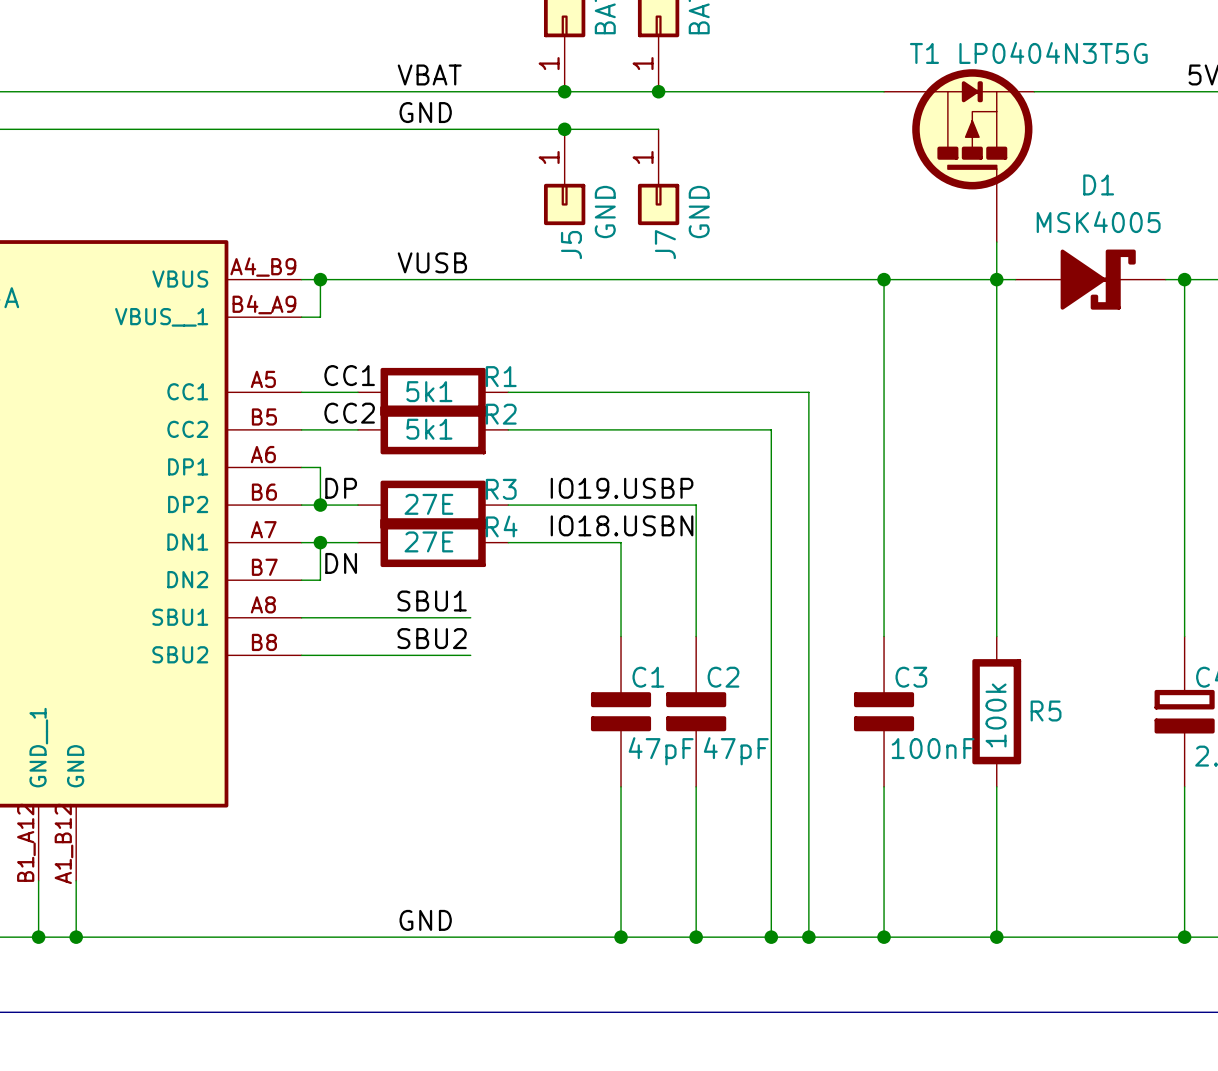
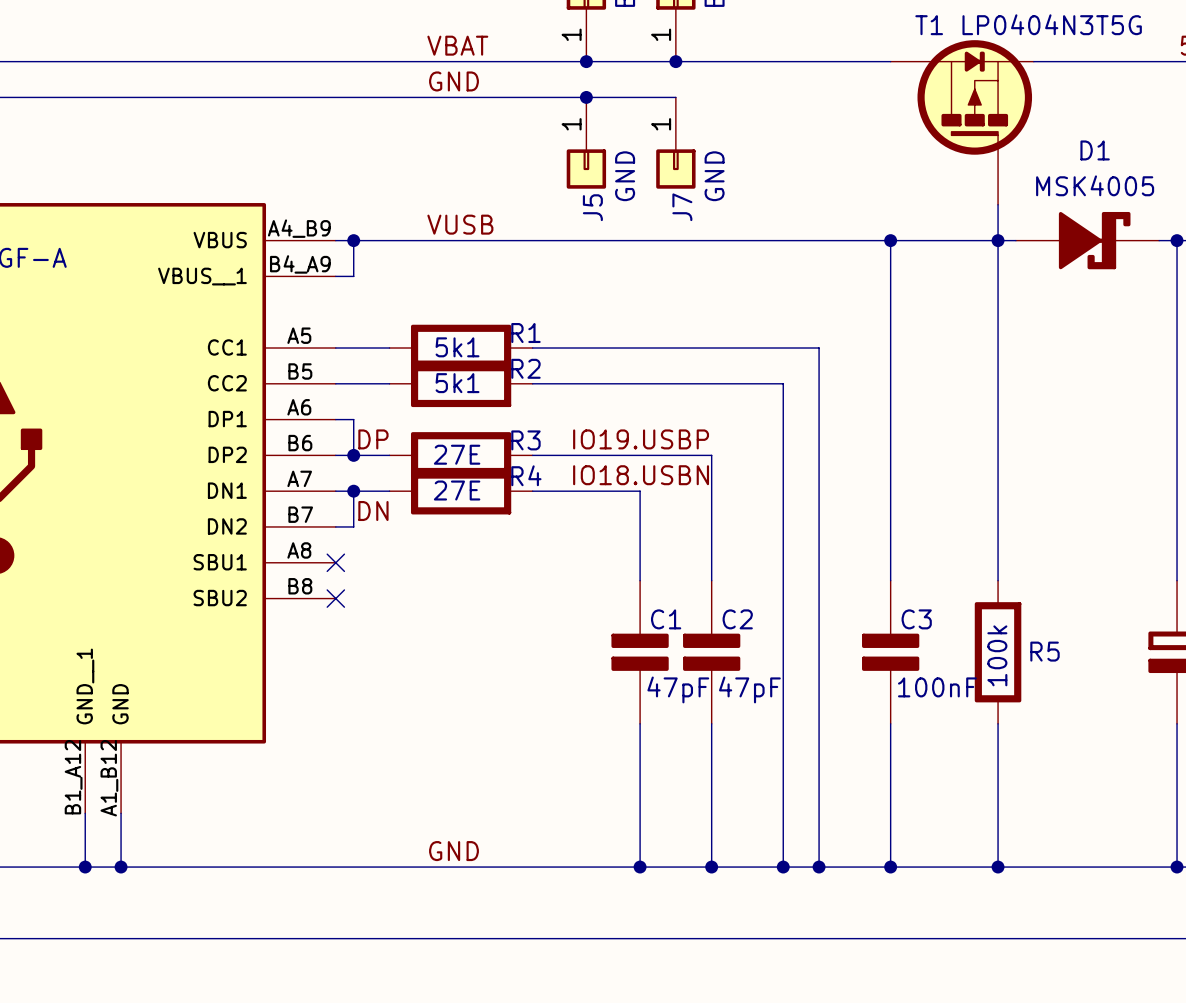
label: CC1 (349, 375) -> none
label: CC2 (349, 413) -> none
label: SBU1 (432, 601) -> none
wire: (301, 617) (470, 617) -> none
no-connect mark: none -> (335, 562)
label: SBU2 (432, 638) -> none
wire: (301, 655) (470, 655) -> none
no-connect mark: none -> (335, 598)

